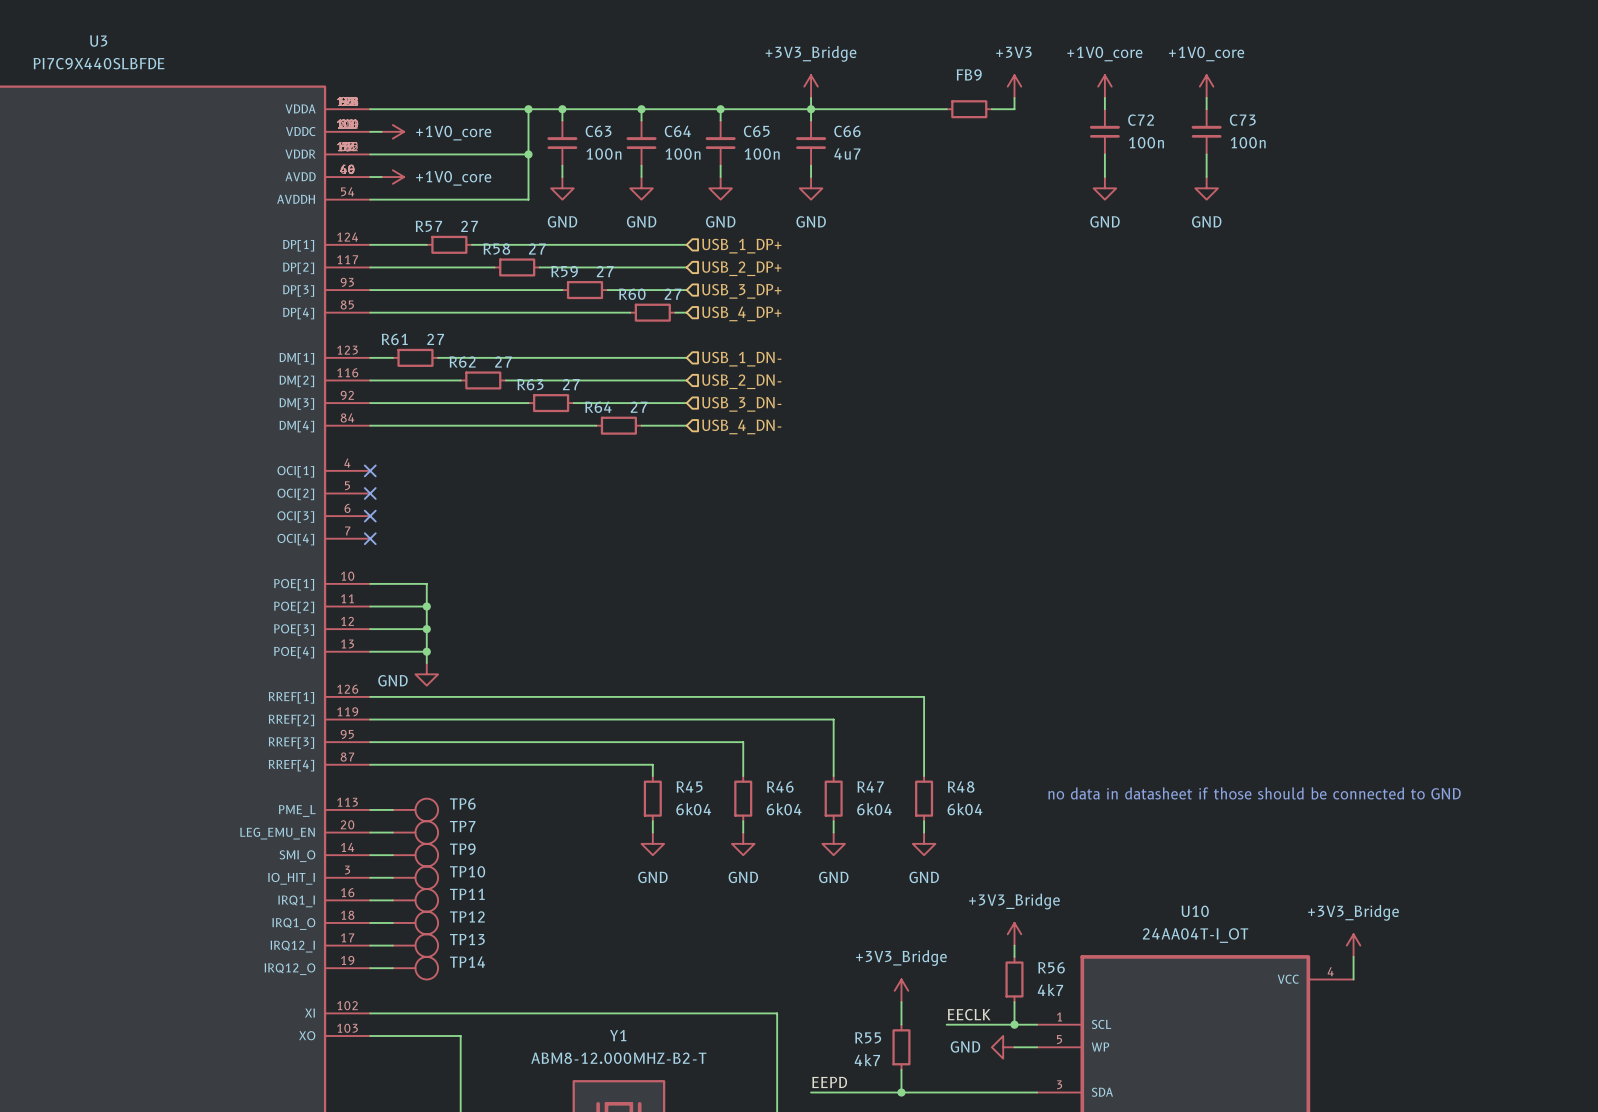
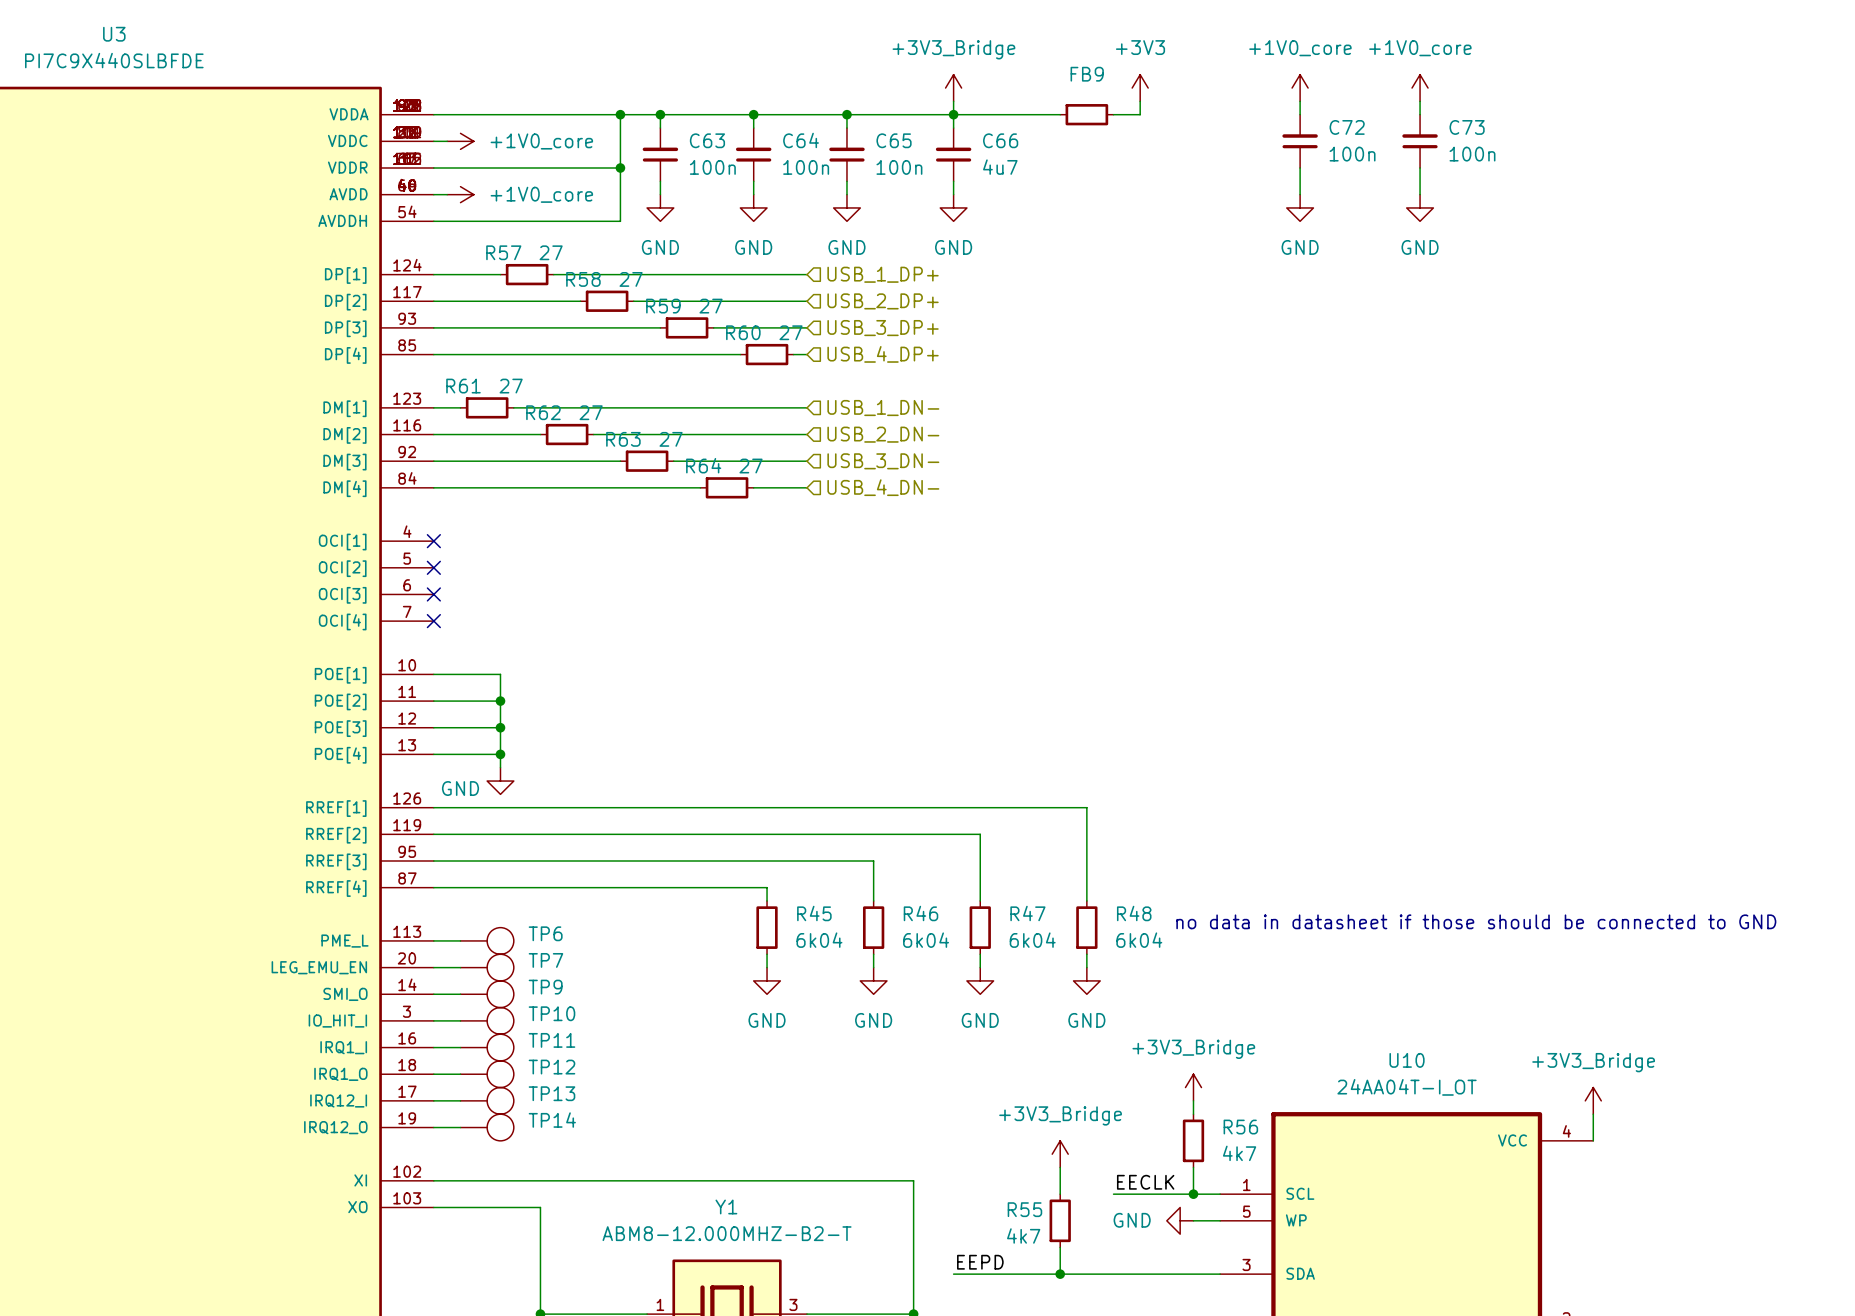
power symbol position: +3V3 (1014, 86) -> +3V3 (1140, 88)
wire: (1014, 97) (1014, 109) (991, 109) -> none
wire: (901, 109) (946, 109) -> (1140, 101) (1140, 114) (1113, 114)
FB9 position: (969, 109) -> (1086, 114)

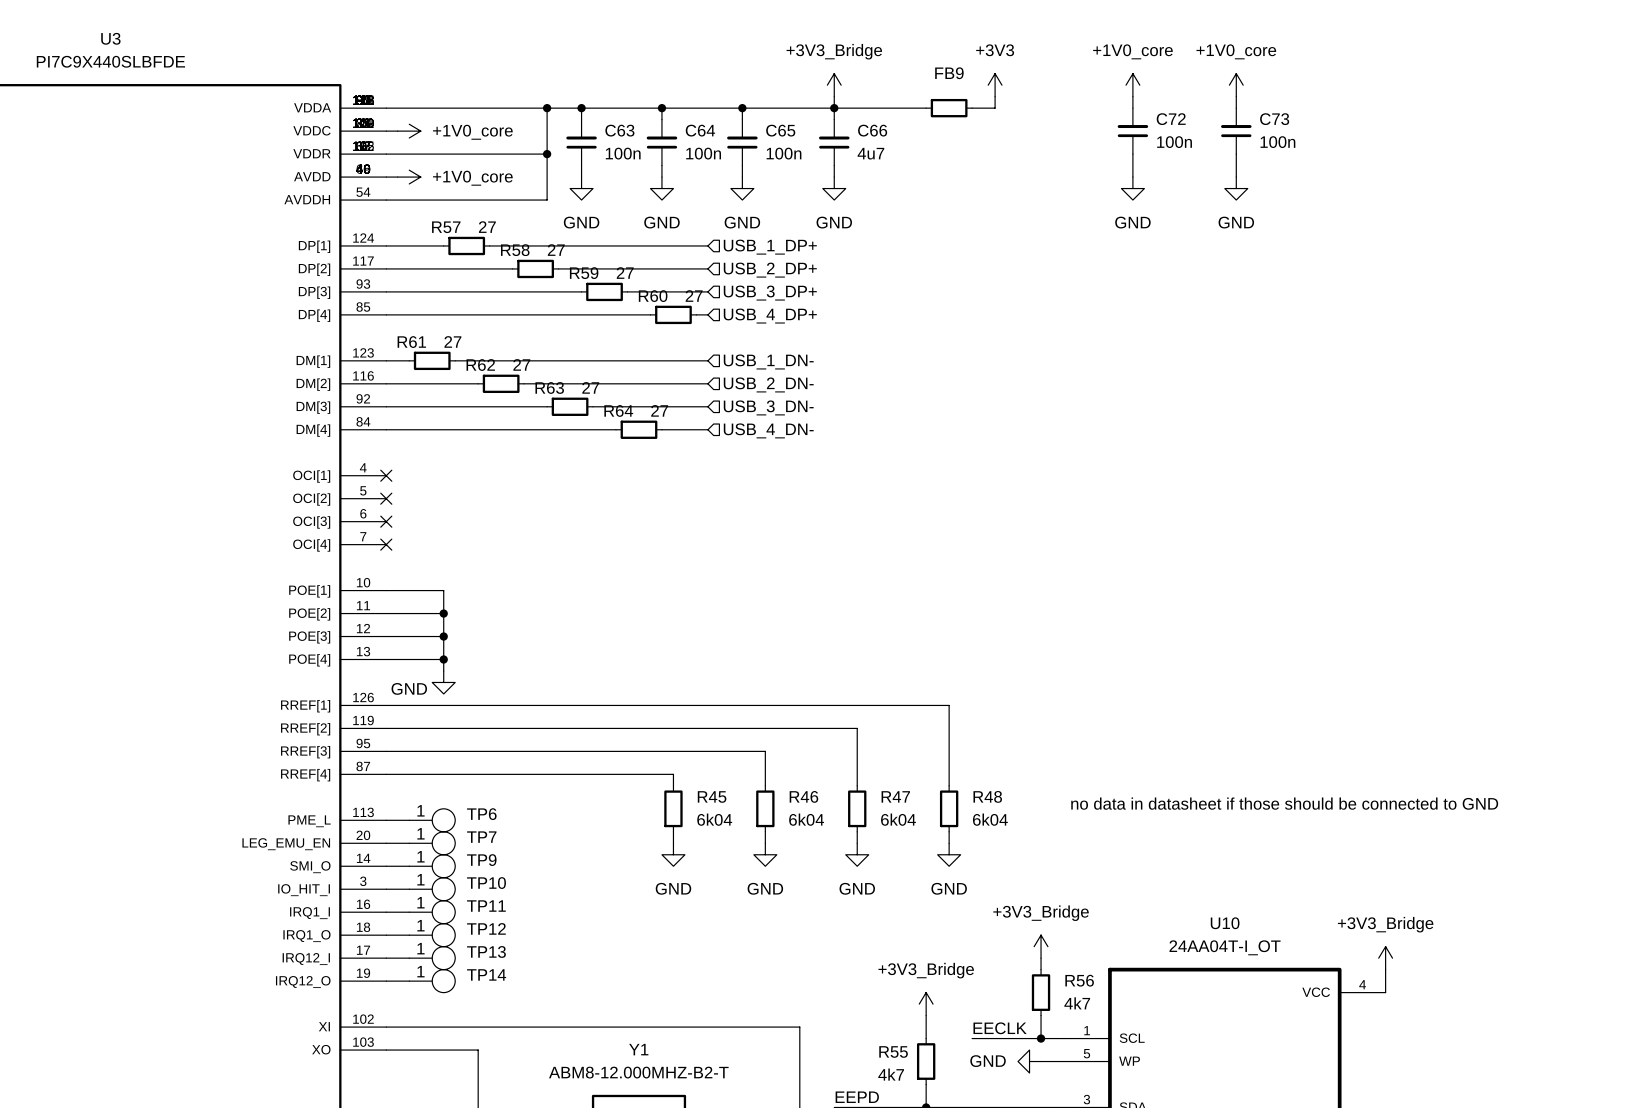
TP6 pin number: none -> 1 (420, 810)
TP7 pin number: none -> 1 (420, 833)
TP9 pin number: none -> 1 (420, 856)
TP10 pin number: none -> 1 (420, 879)
TP11 pin number: none -> 1 (420, 902)
TP12 pin number: none -> 1 (420, 925)
TP13 pin number: none -> 1 (420, 948)
TP14 pin number: none -> 1 (420, 971)

